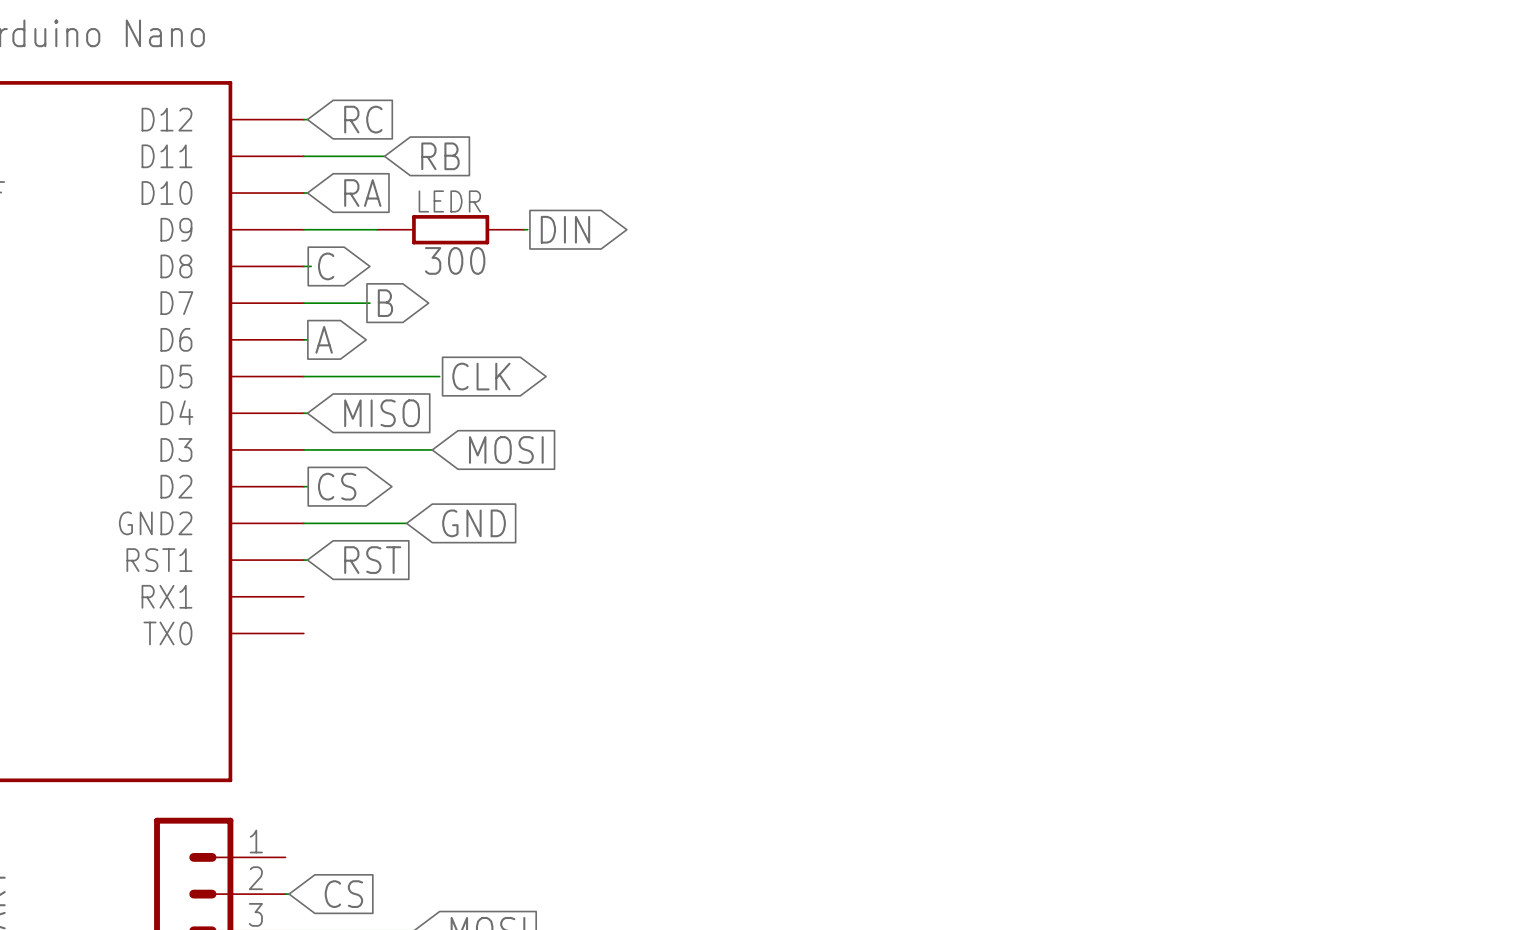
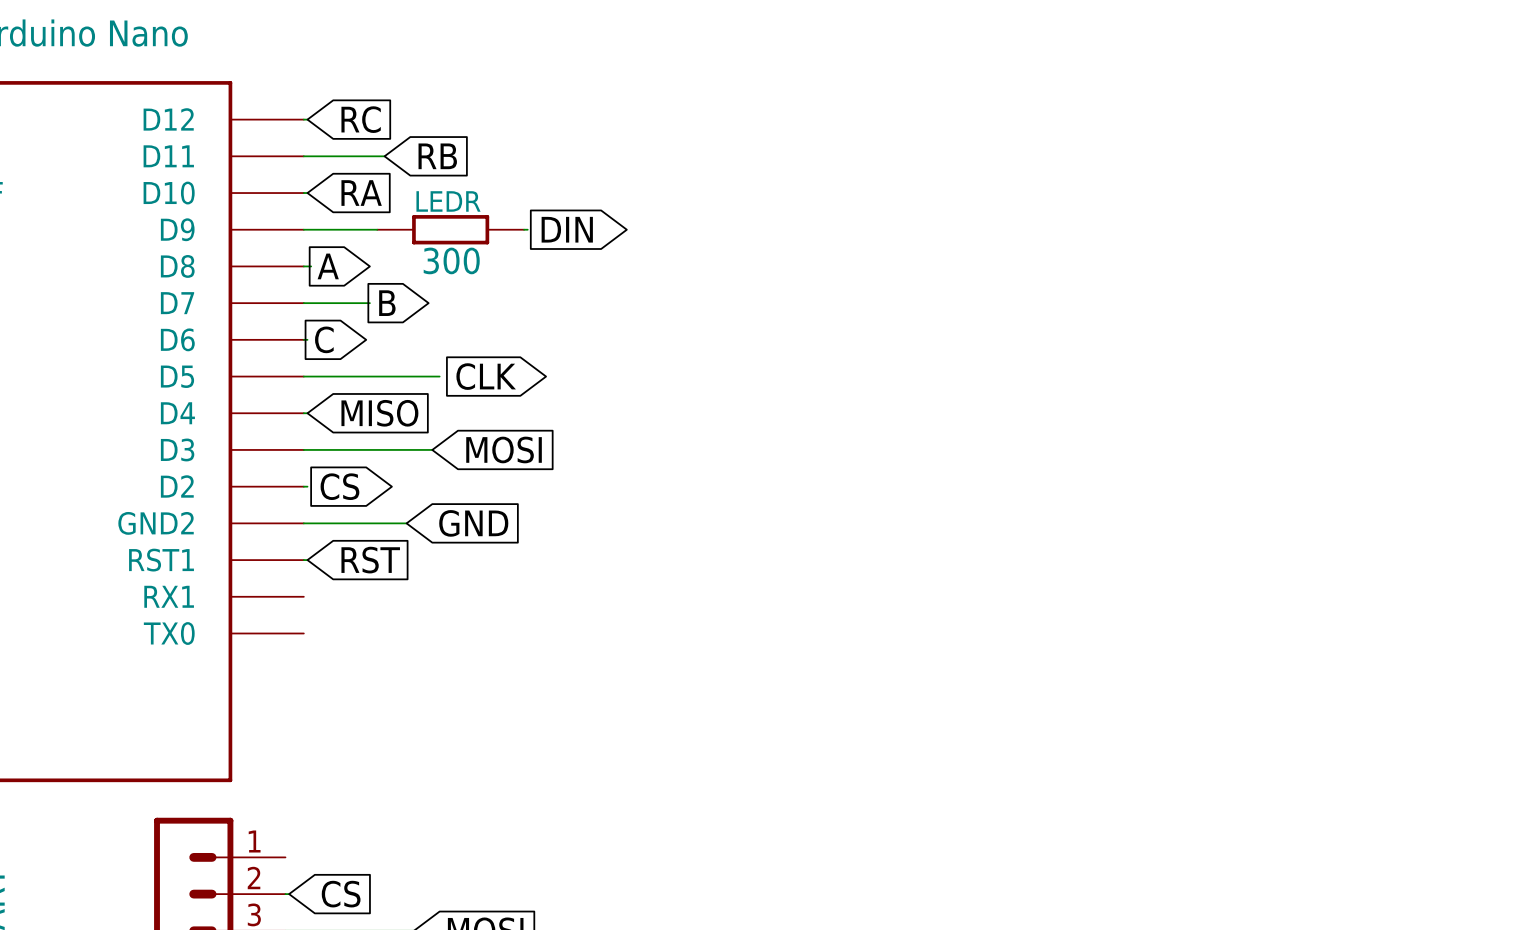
global label: C (326, 266) -> A (328, 266)
global label: A (324, 339) -> C (324, 339)

